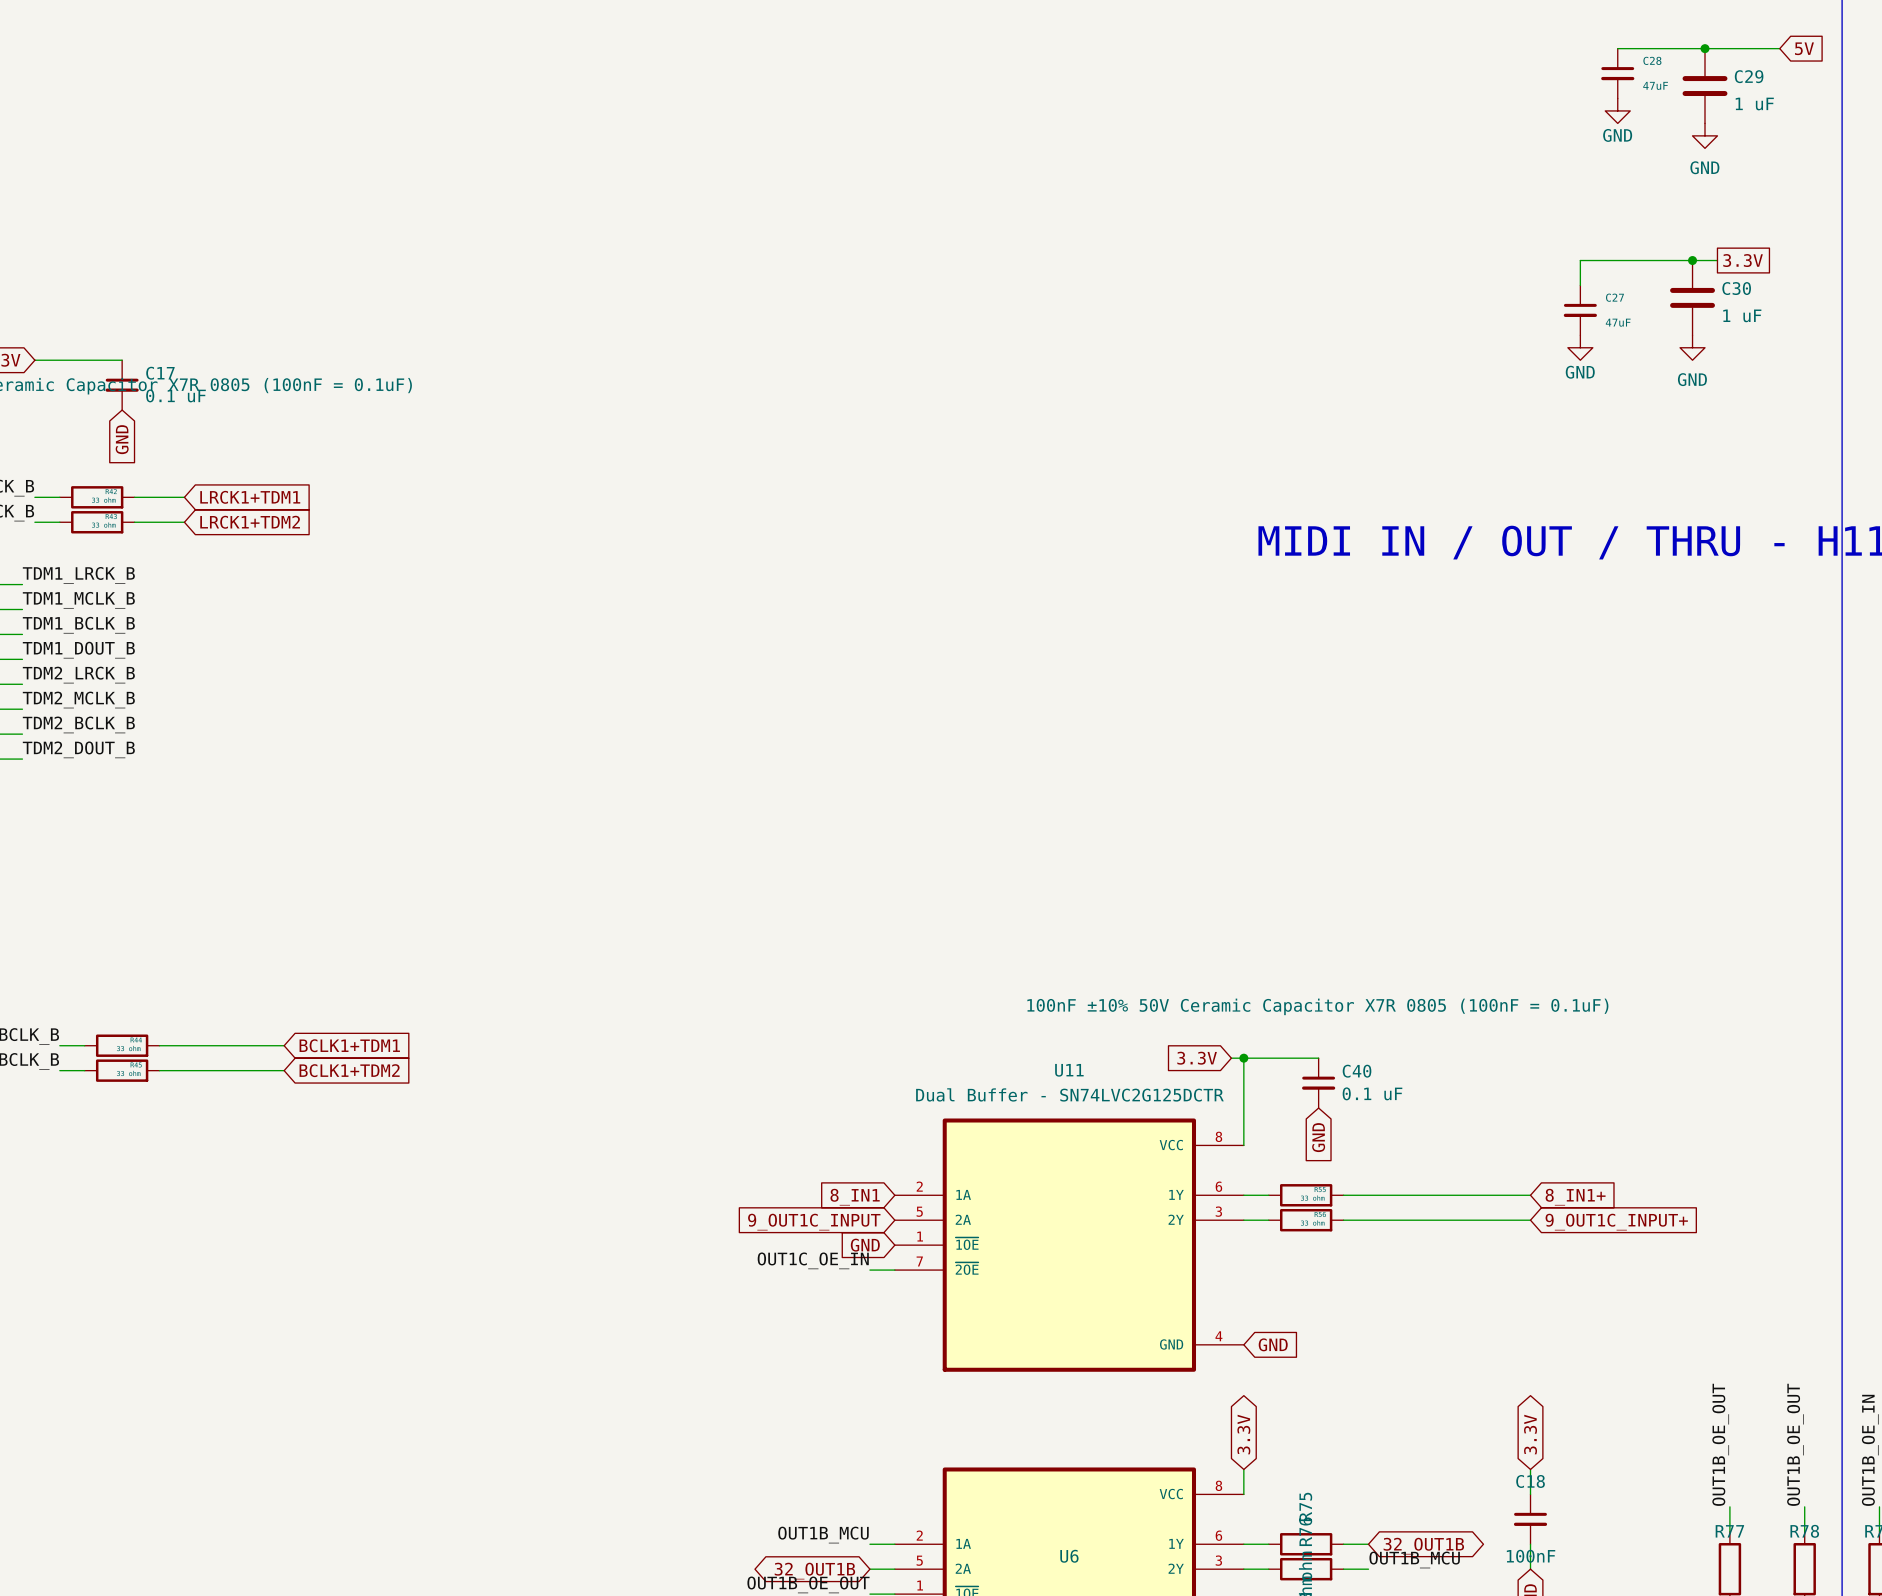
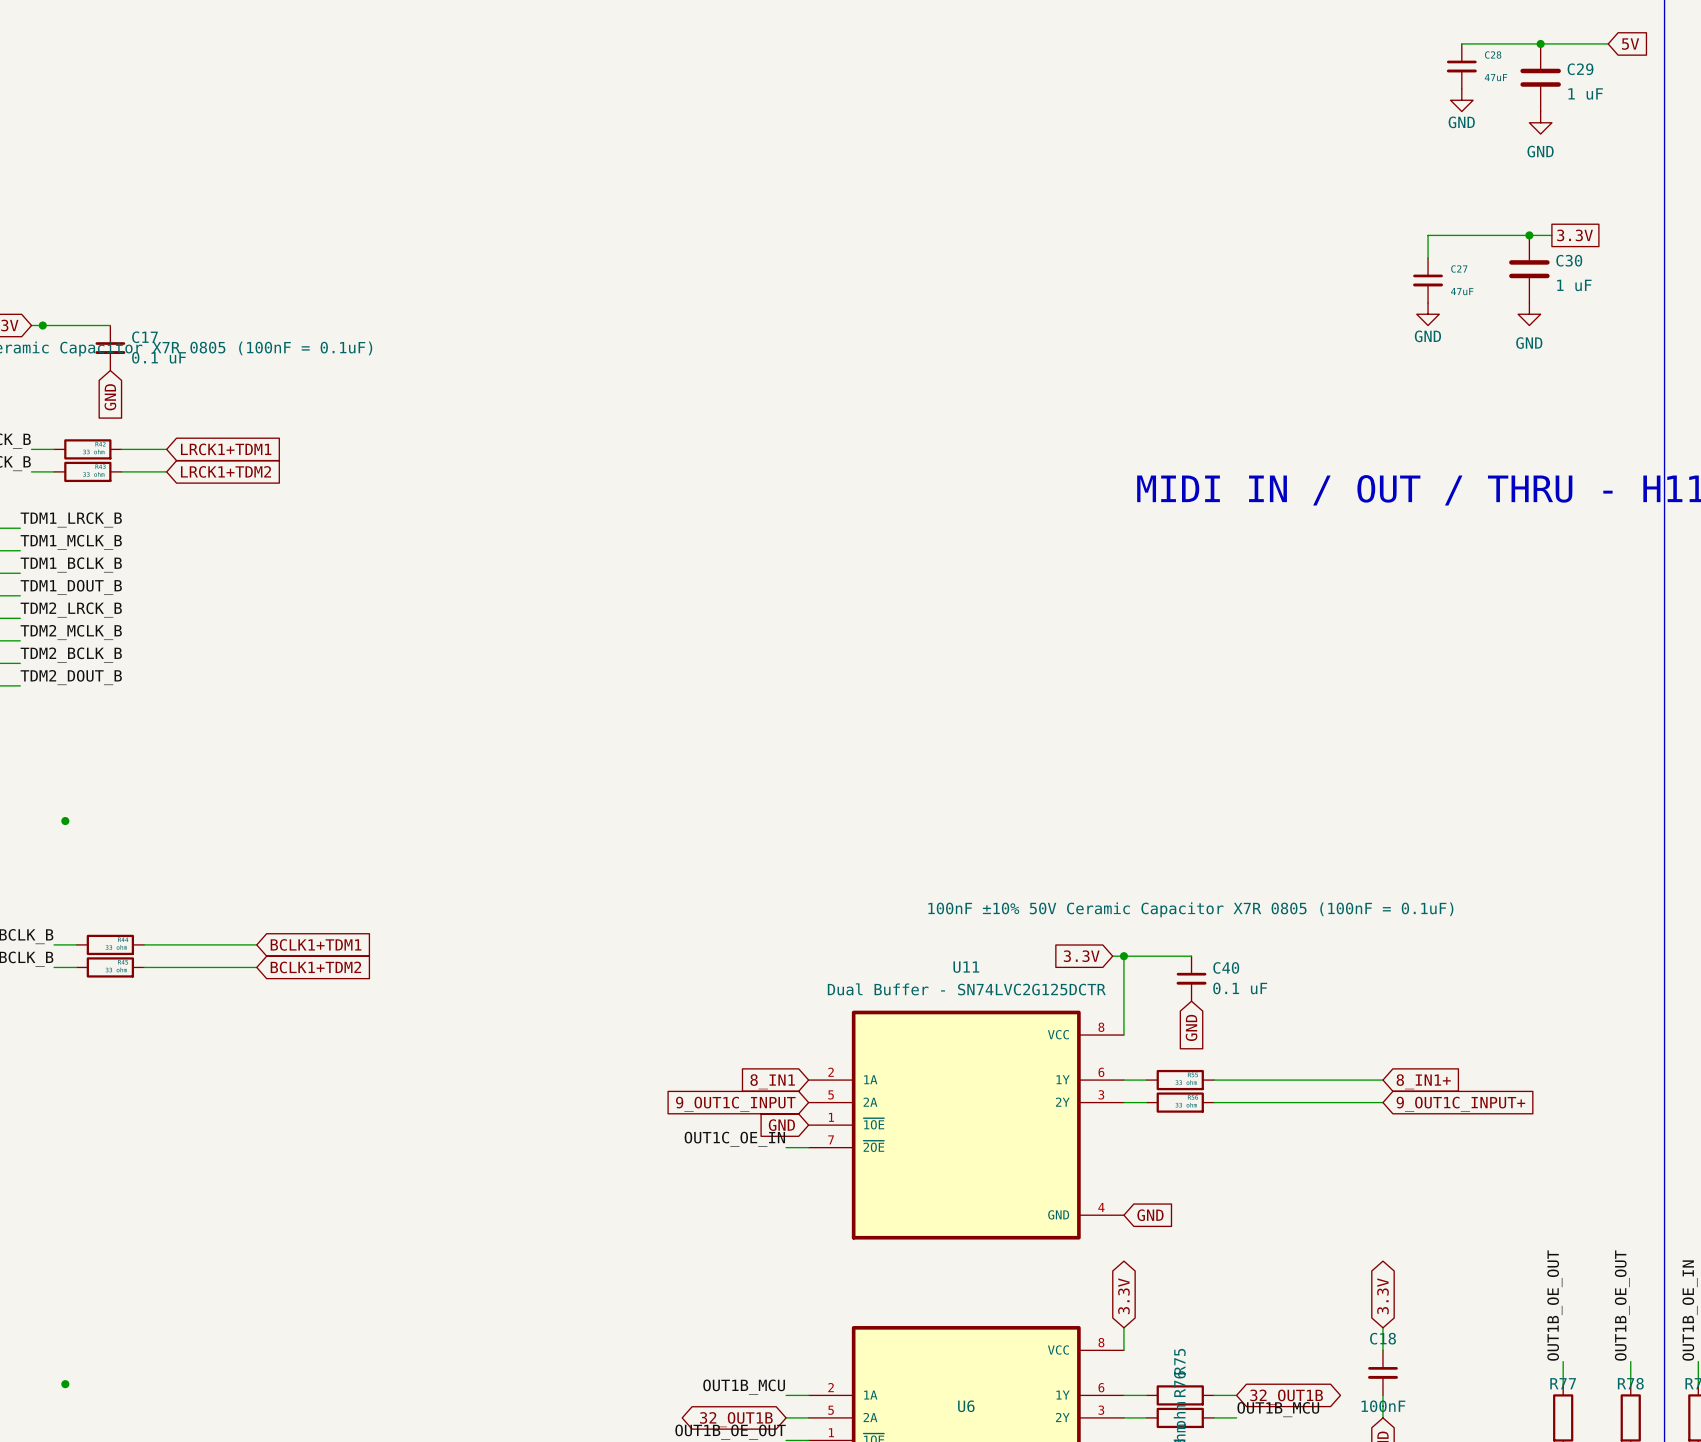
junction: none -> (42, 325)
junction: none -> (65, 821)
junction: none -> (65, 1384)

